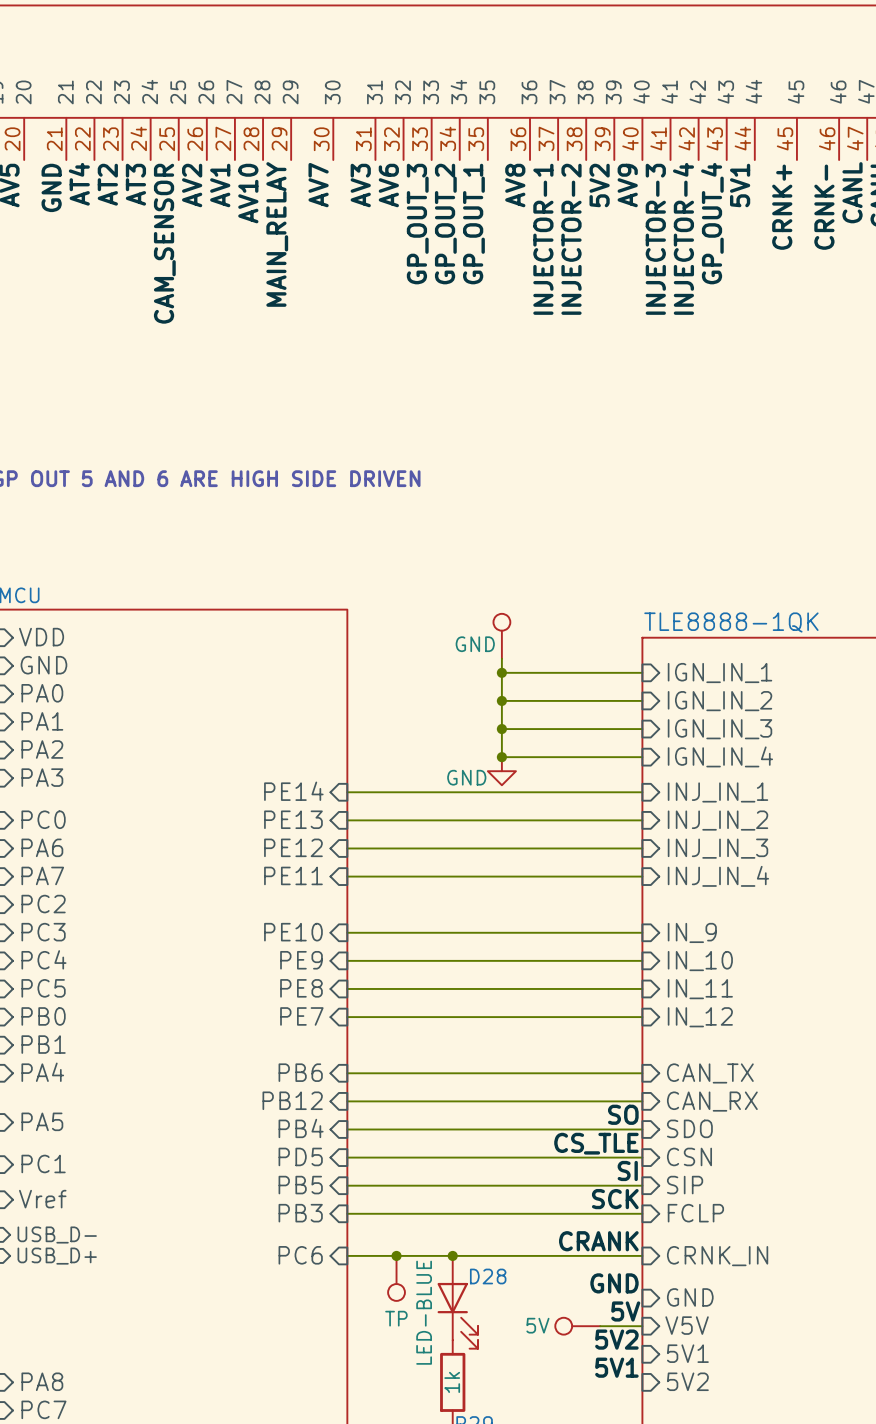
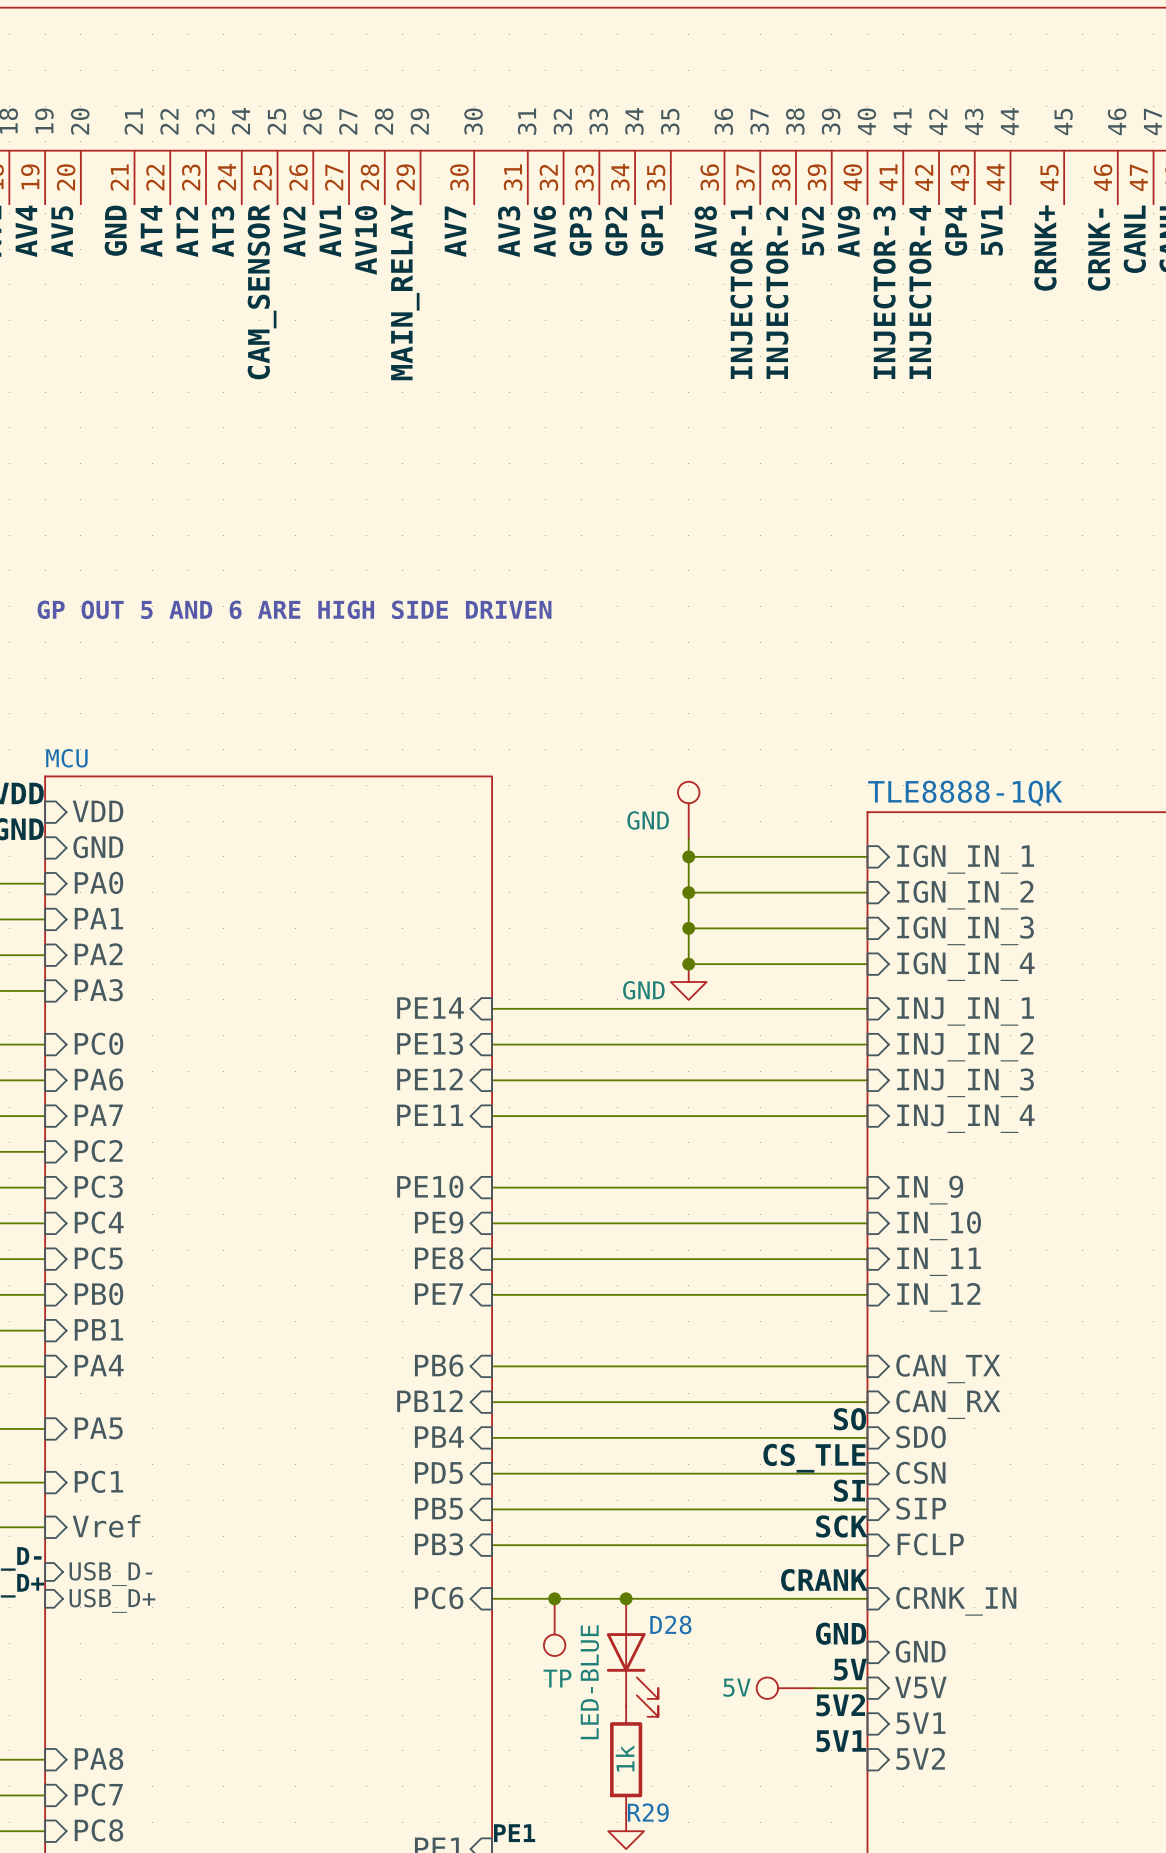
label: GP_OUT_4 (712, 223) -> GP4 (956, 230)
label: GP_OUT_3 (417, 224) -> GP3 (580, 231)
label: GP_OUT_2 (445, 224) -> GP2 (616, 231)
label: GP_OUT_1 (473, 224) -> GP1 (652, 230)

